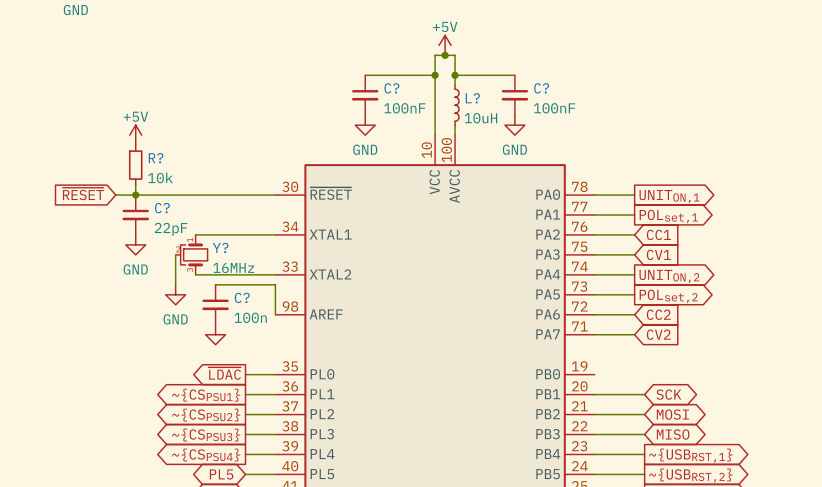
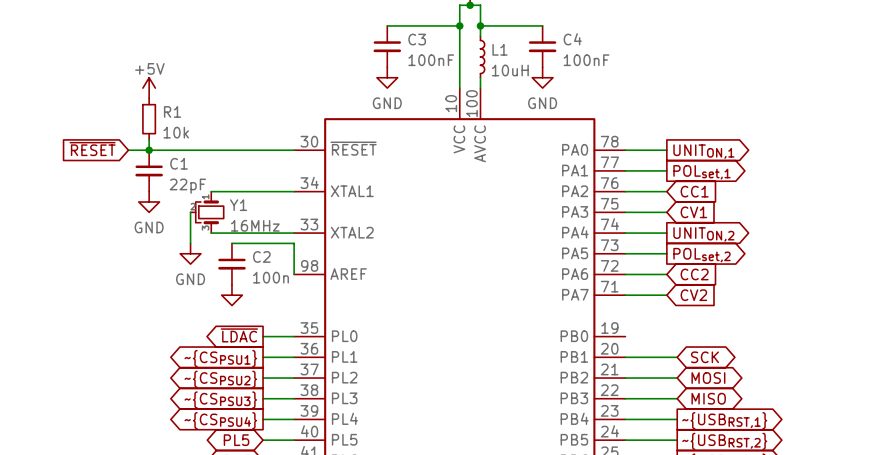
C? name: C? (391, 88) -> C3 (417, 39)
C? name: C? (541, 88) -> C4 (572, 39)
L? name: L? (472, 98) -> L1 (499, 49)
R? name: R? (156, 158) -> R1 (172, 111)
C? name: C? (162, 208) -> C1 (179, 163)
Y? name: Y? (220, 247) -> Y1 (238, 205)
C? name: C? (242, 297) -> C2 (261, 256)

